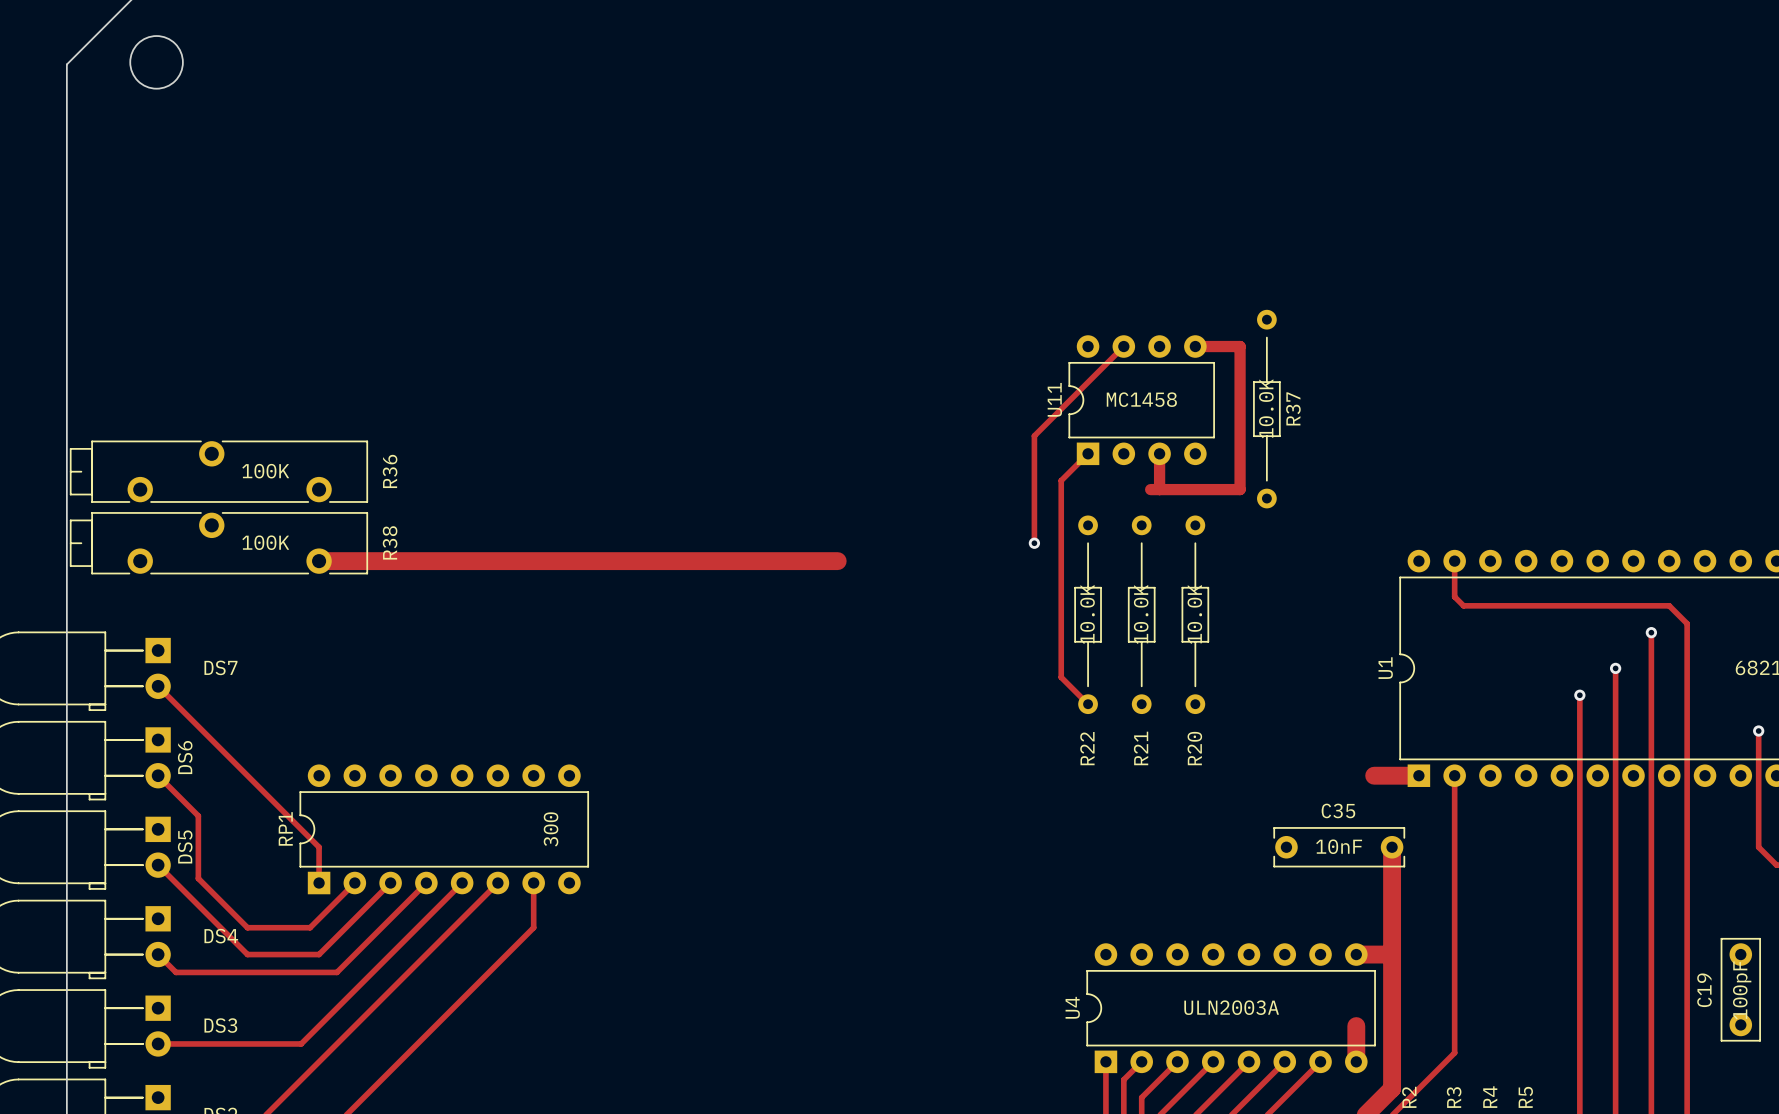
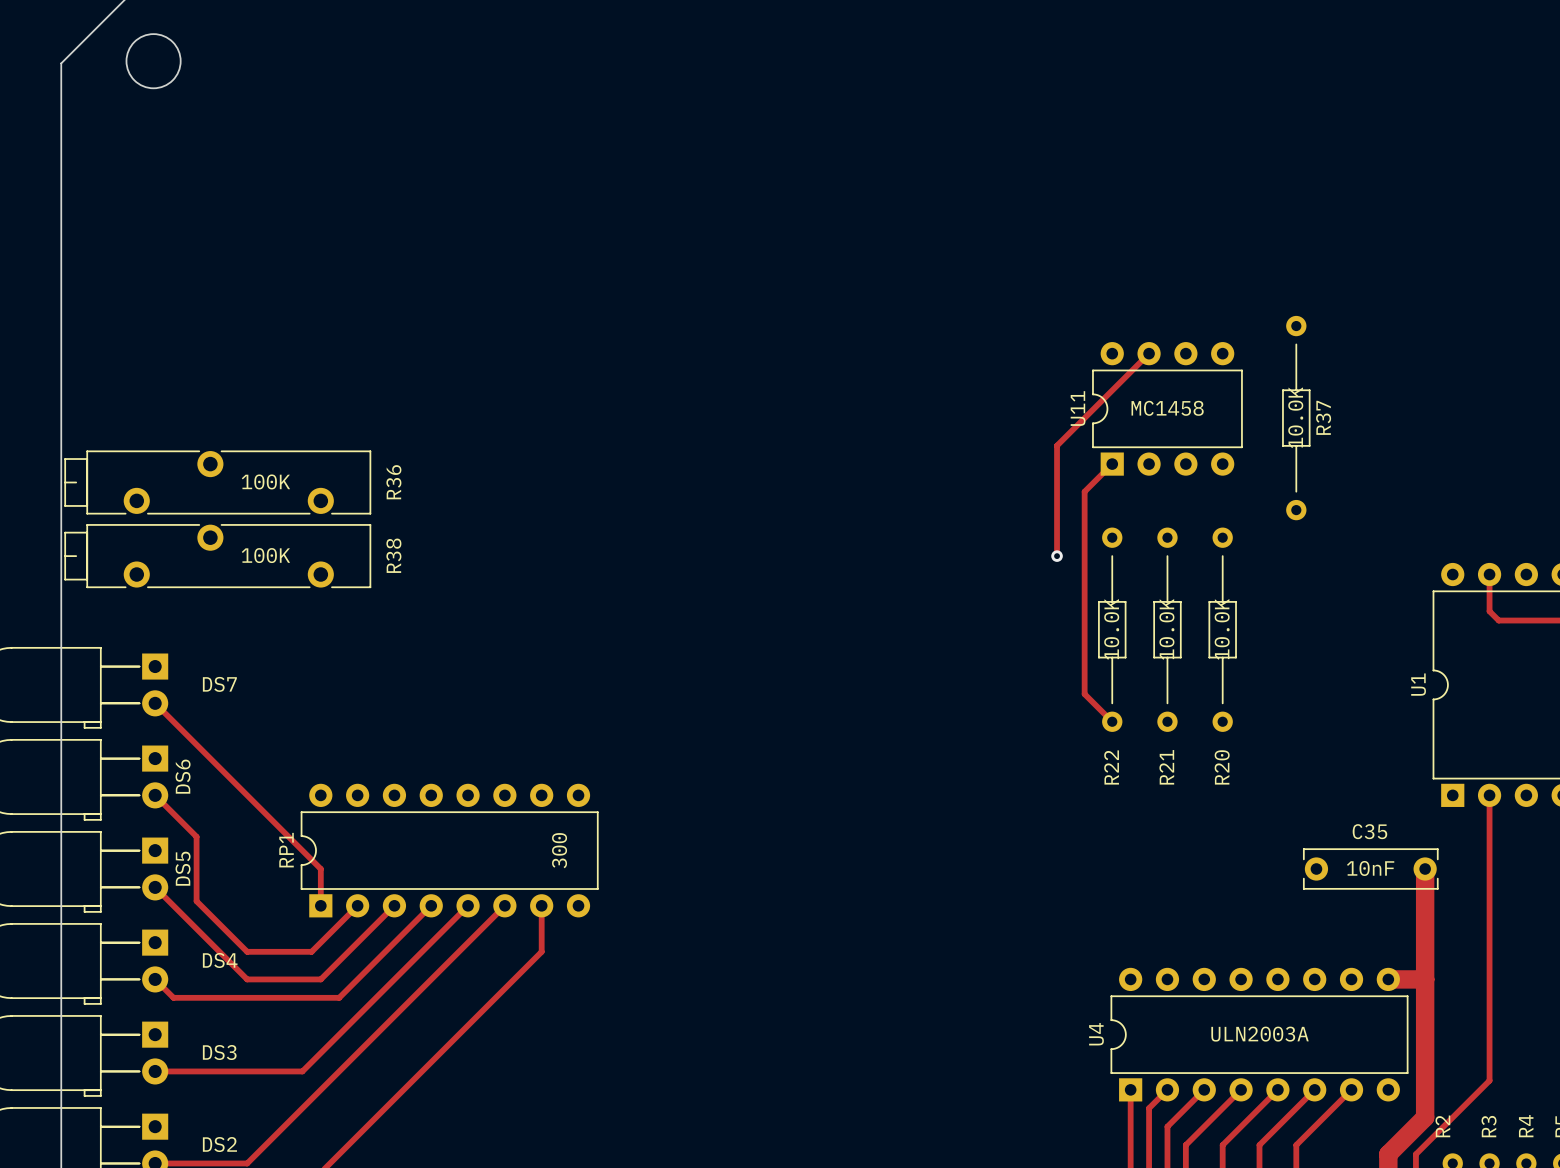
track: (1195, 346) (1240, 346) (1240, 489) (1150, 489) -> none
track: (1159, 453) (1159, 489) -> none
track: (319, 561) (837, 561) -> none
track: (1374, 775) (1418, 775) -> none
track: (1356, 1026) (1356, 1061) -> none

